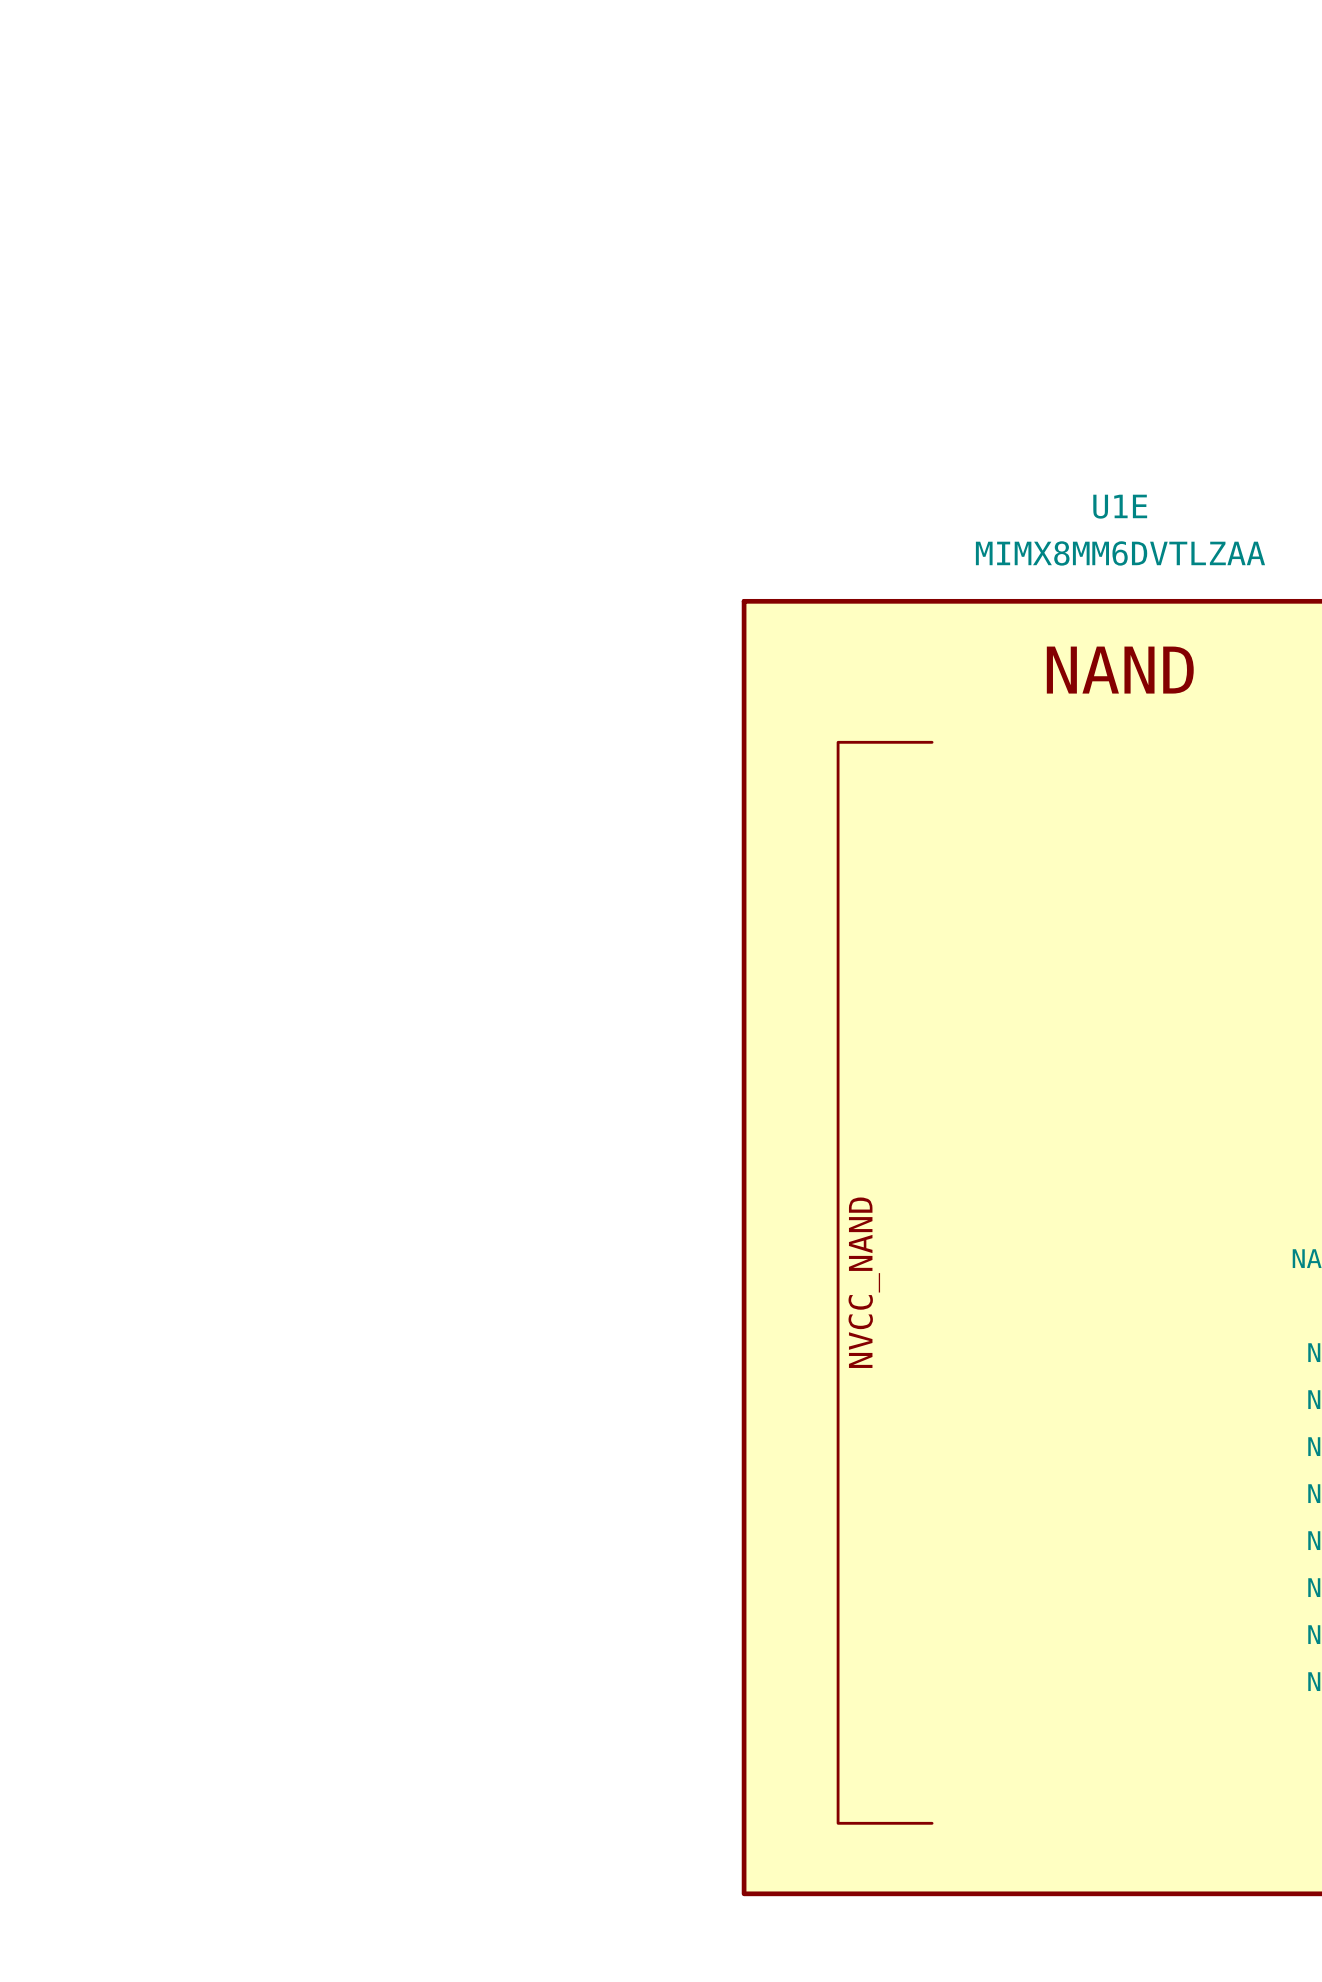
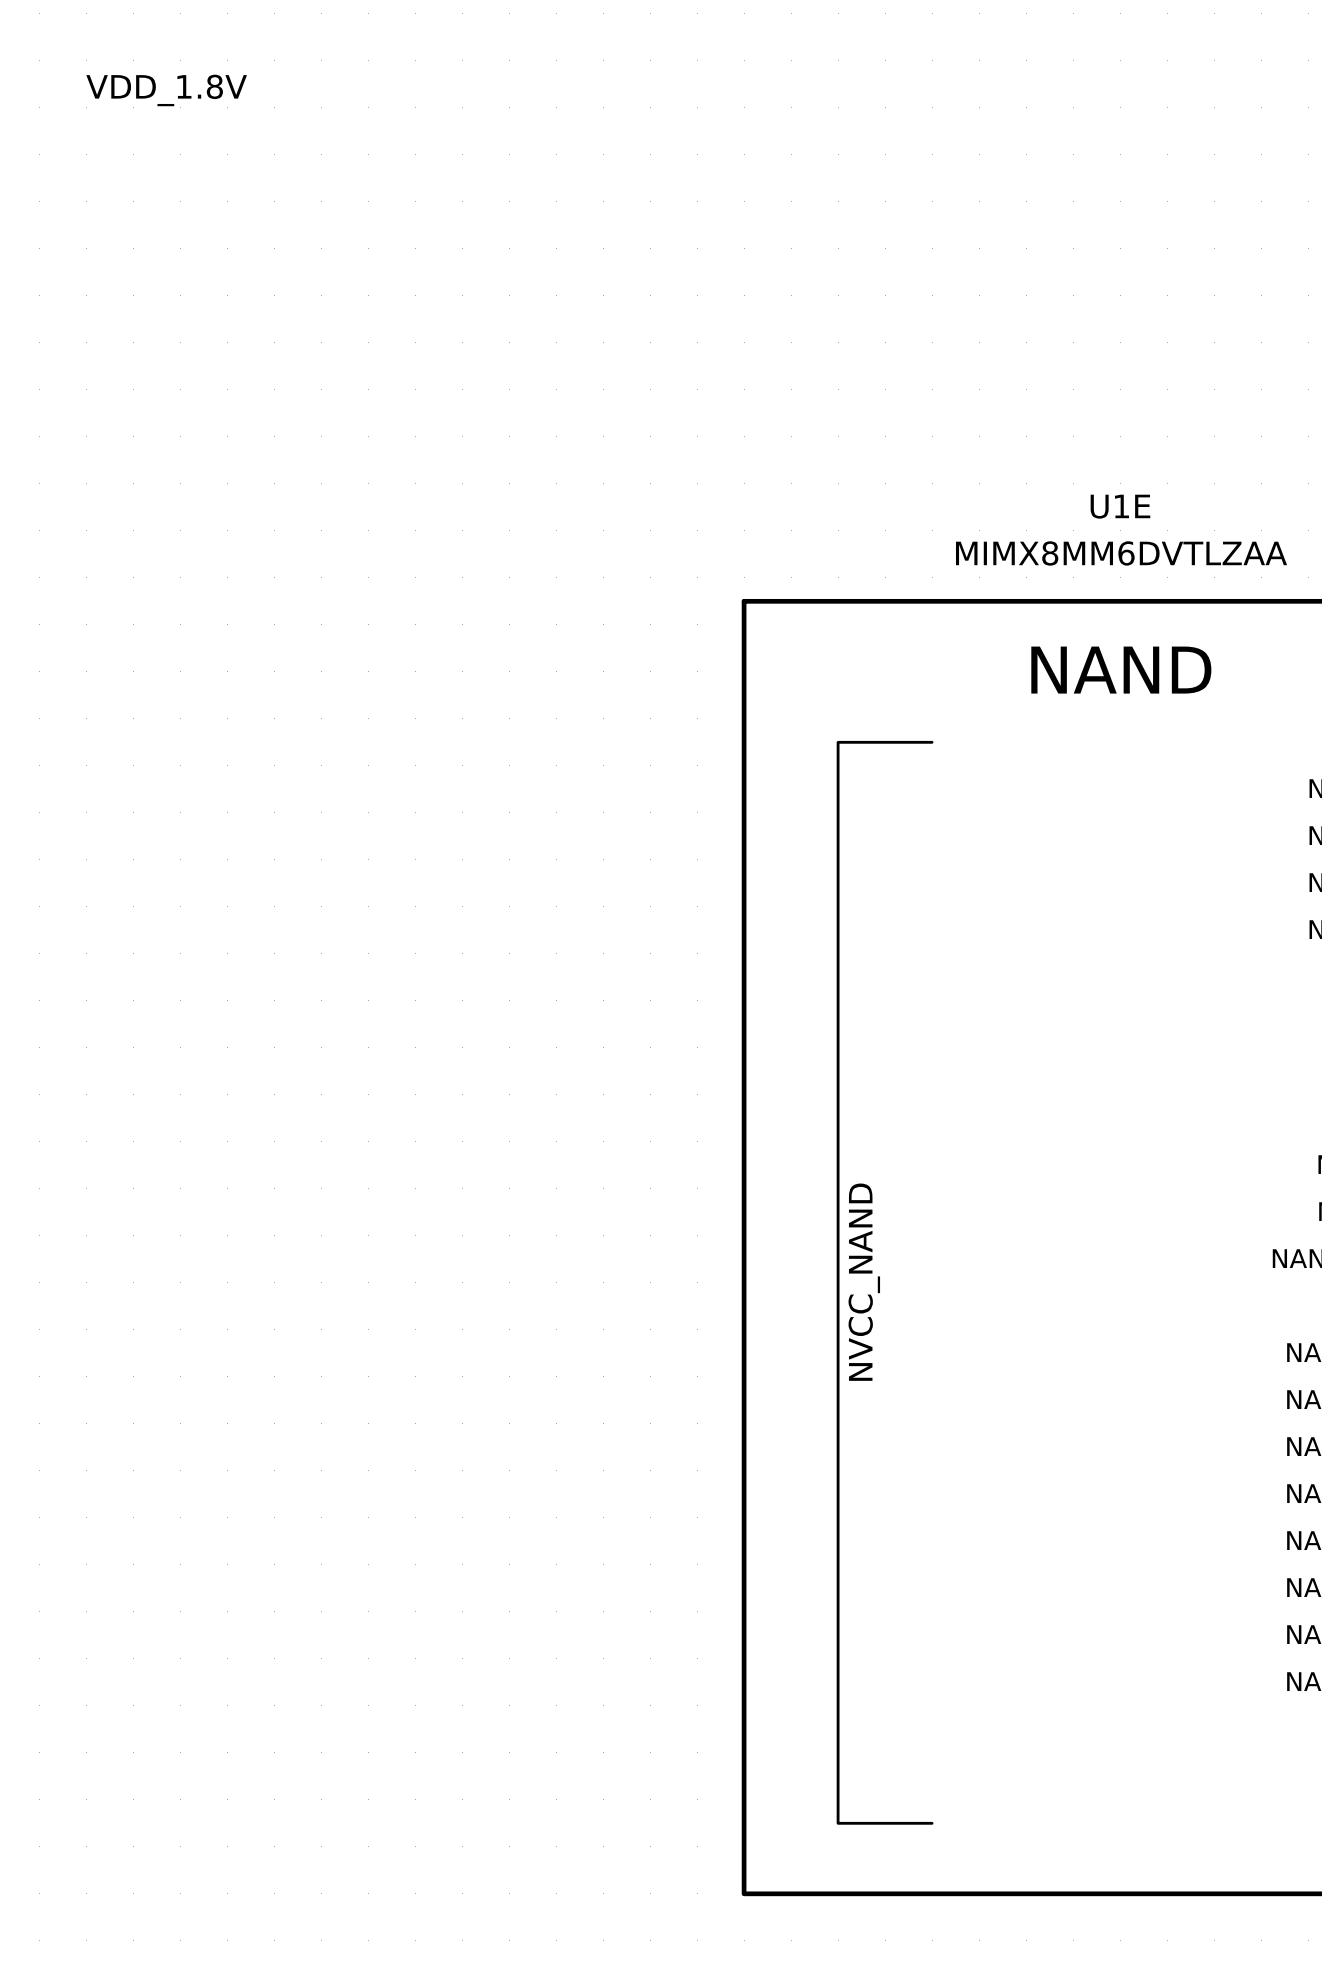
label: none -> VDD_1.8V (166, 90)

